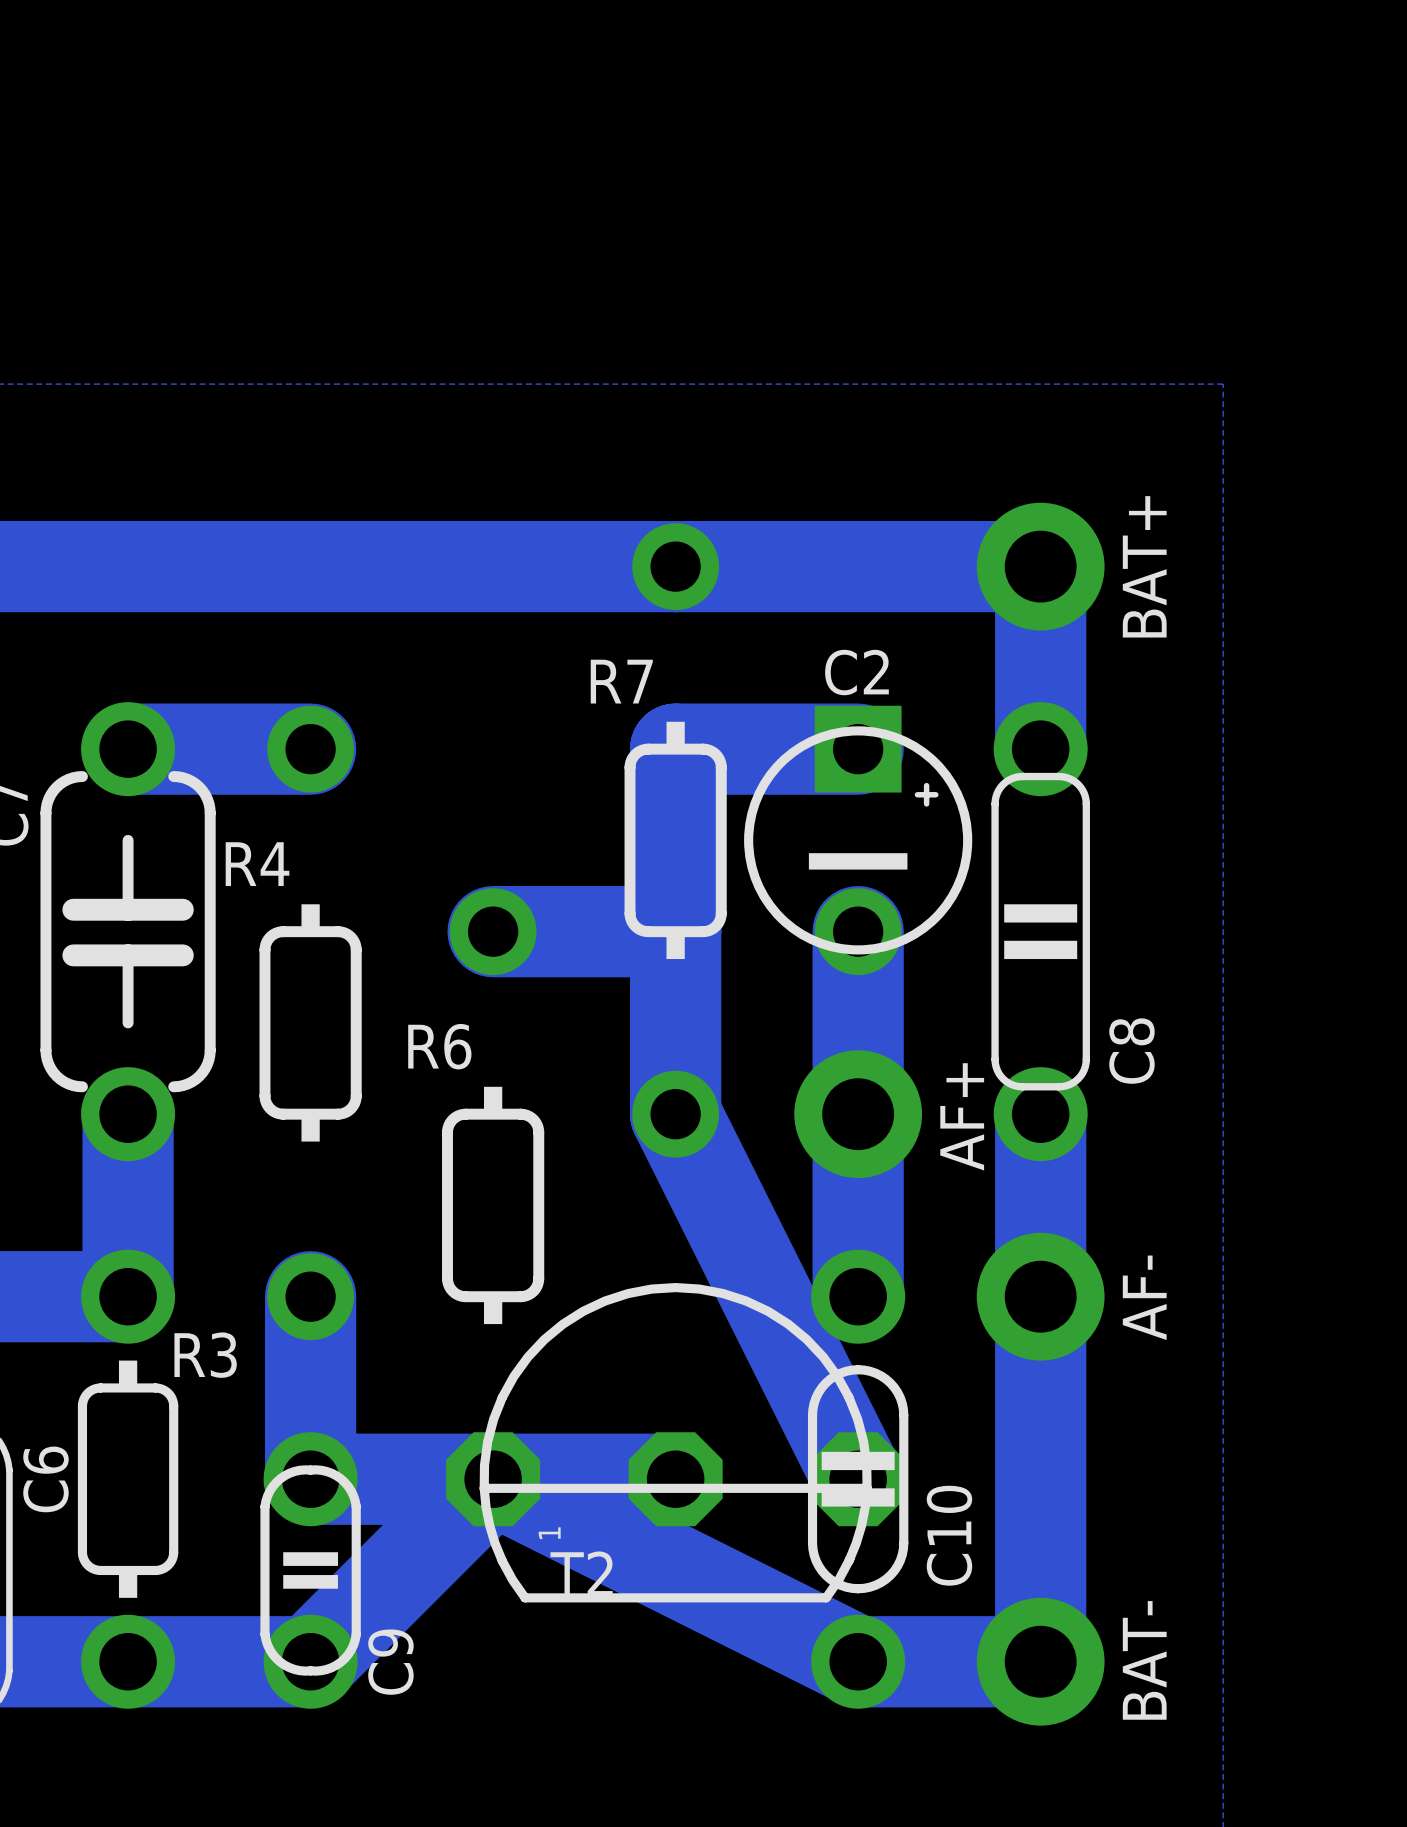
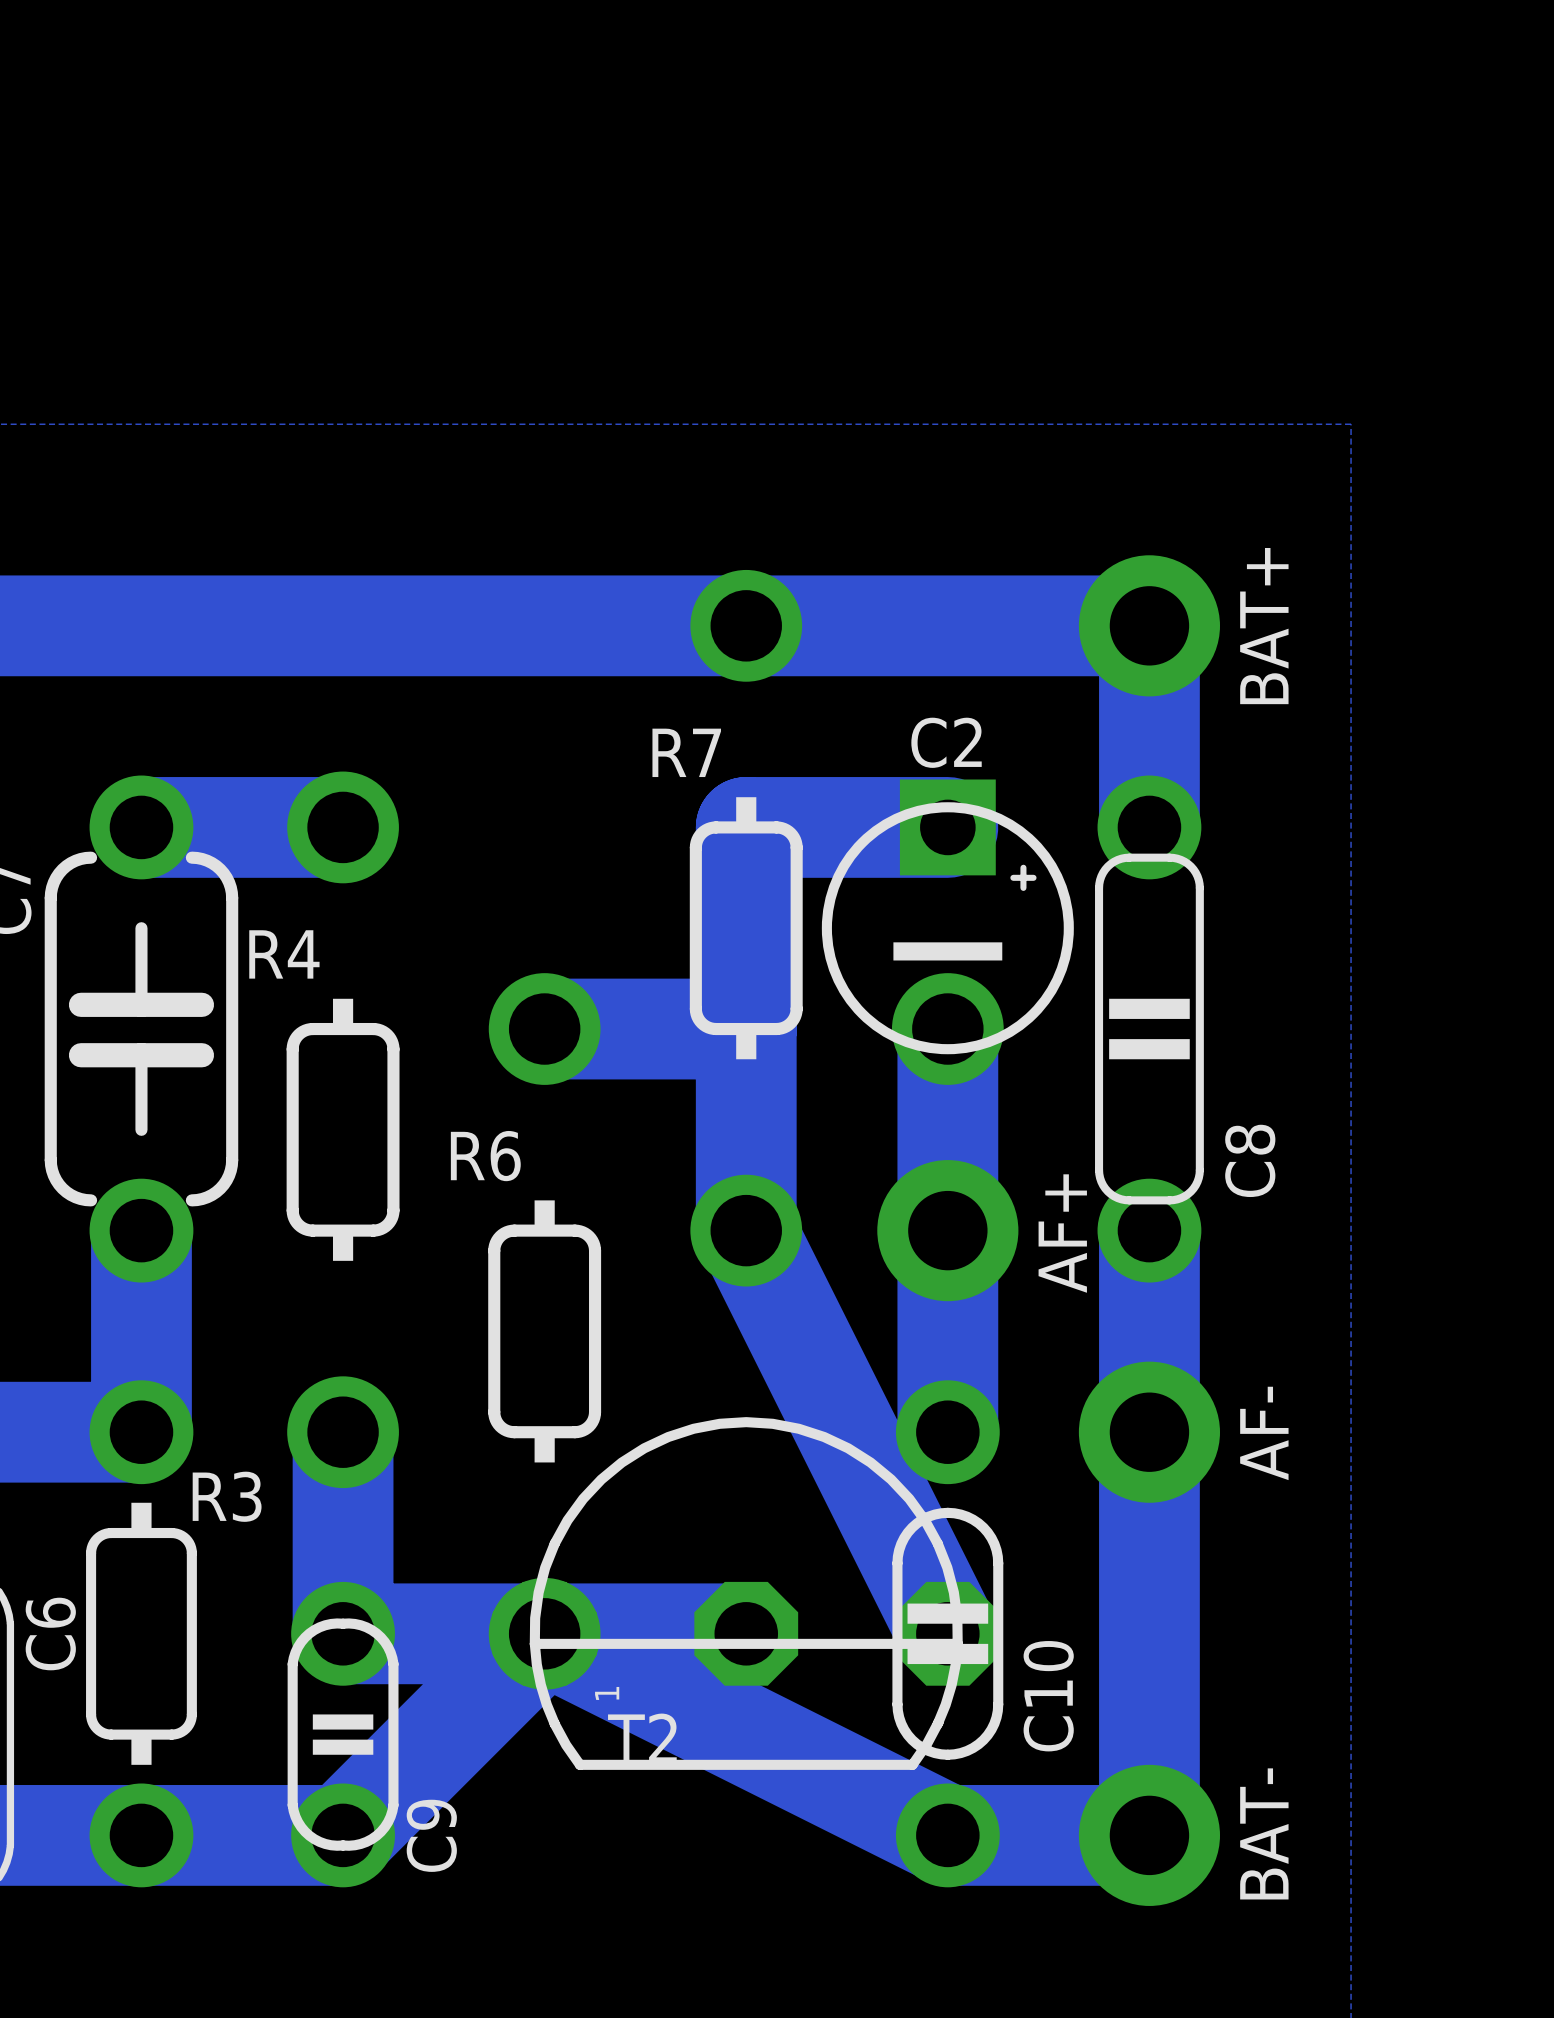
R7 footprint: [624, 523, 727, 1158] -> [689, 569, 803, 1287]
R4 footprint: [259, 705, 362, 1341] -> [286, 771, 400, 1489]
C2 footprint: [744, 705, 973, 976] -> [821, 779, 1074, 1085]
R6 footprint: [442, 888, 545, 1523] -> [488, 973, 602, 1690]

